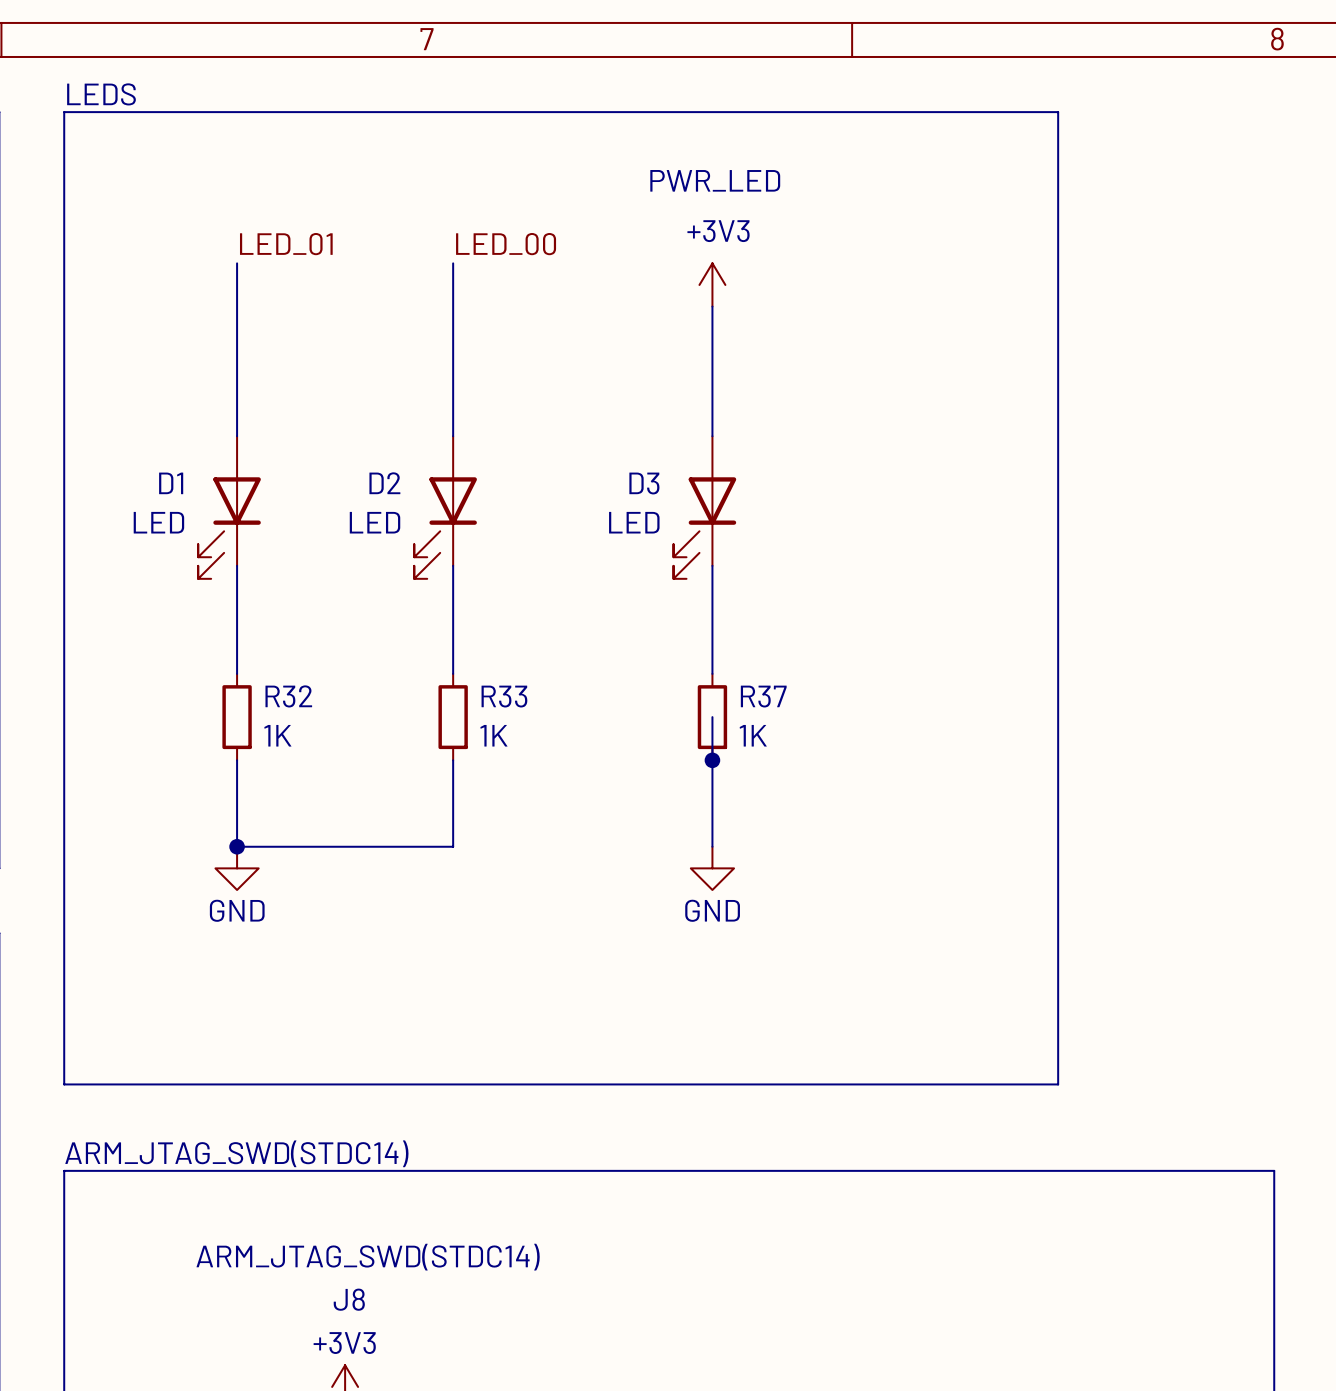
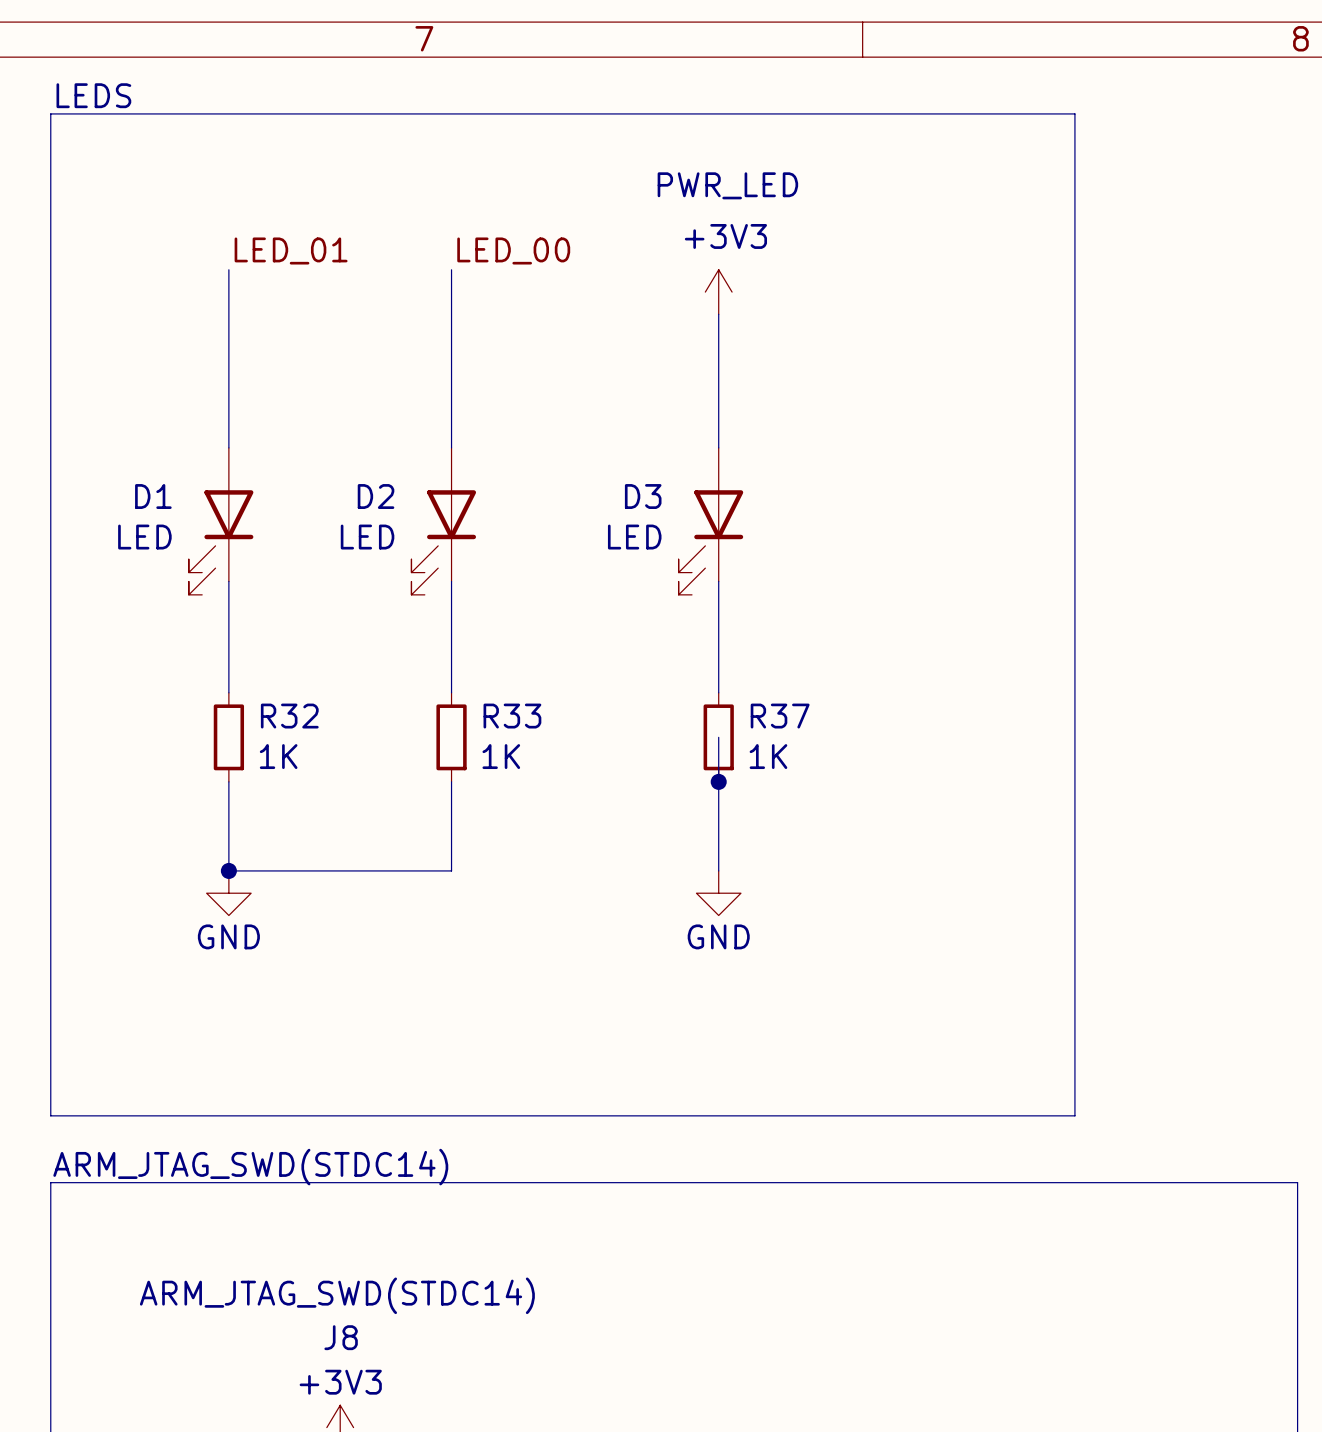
text position: ARM_JTAG_SWD(STDC14) (236, 1153) -> ARM_JTAG_SWD(STDC14) (250, 1167)
line: (64, 1170) (1274, 1170) -> (50, 1204) (50, 1182) (1297, 1182) (1297, 1204)

